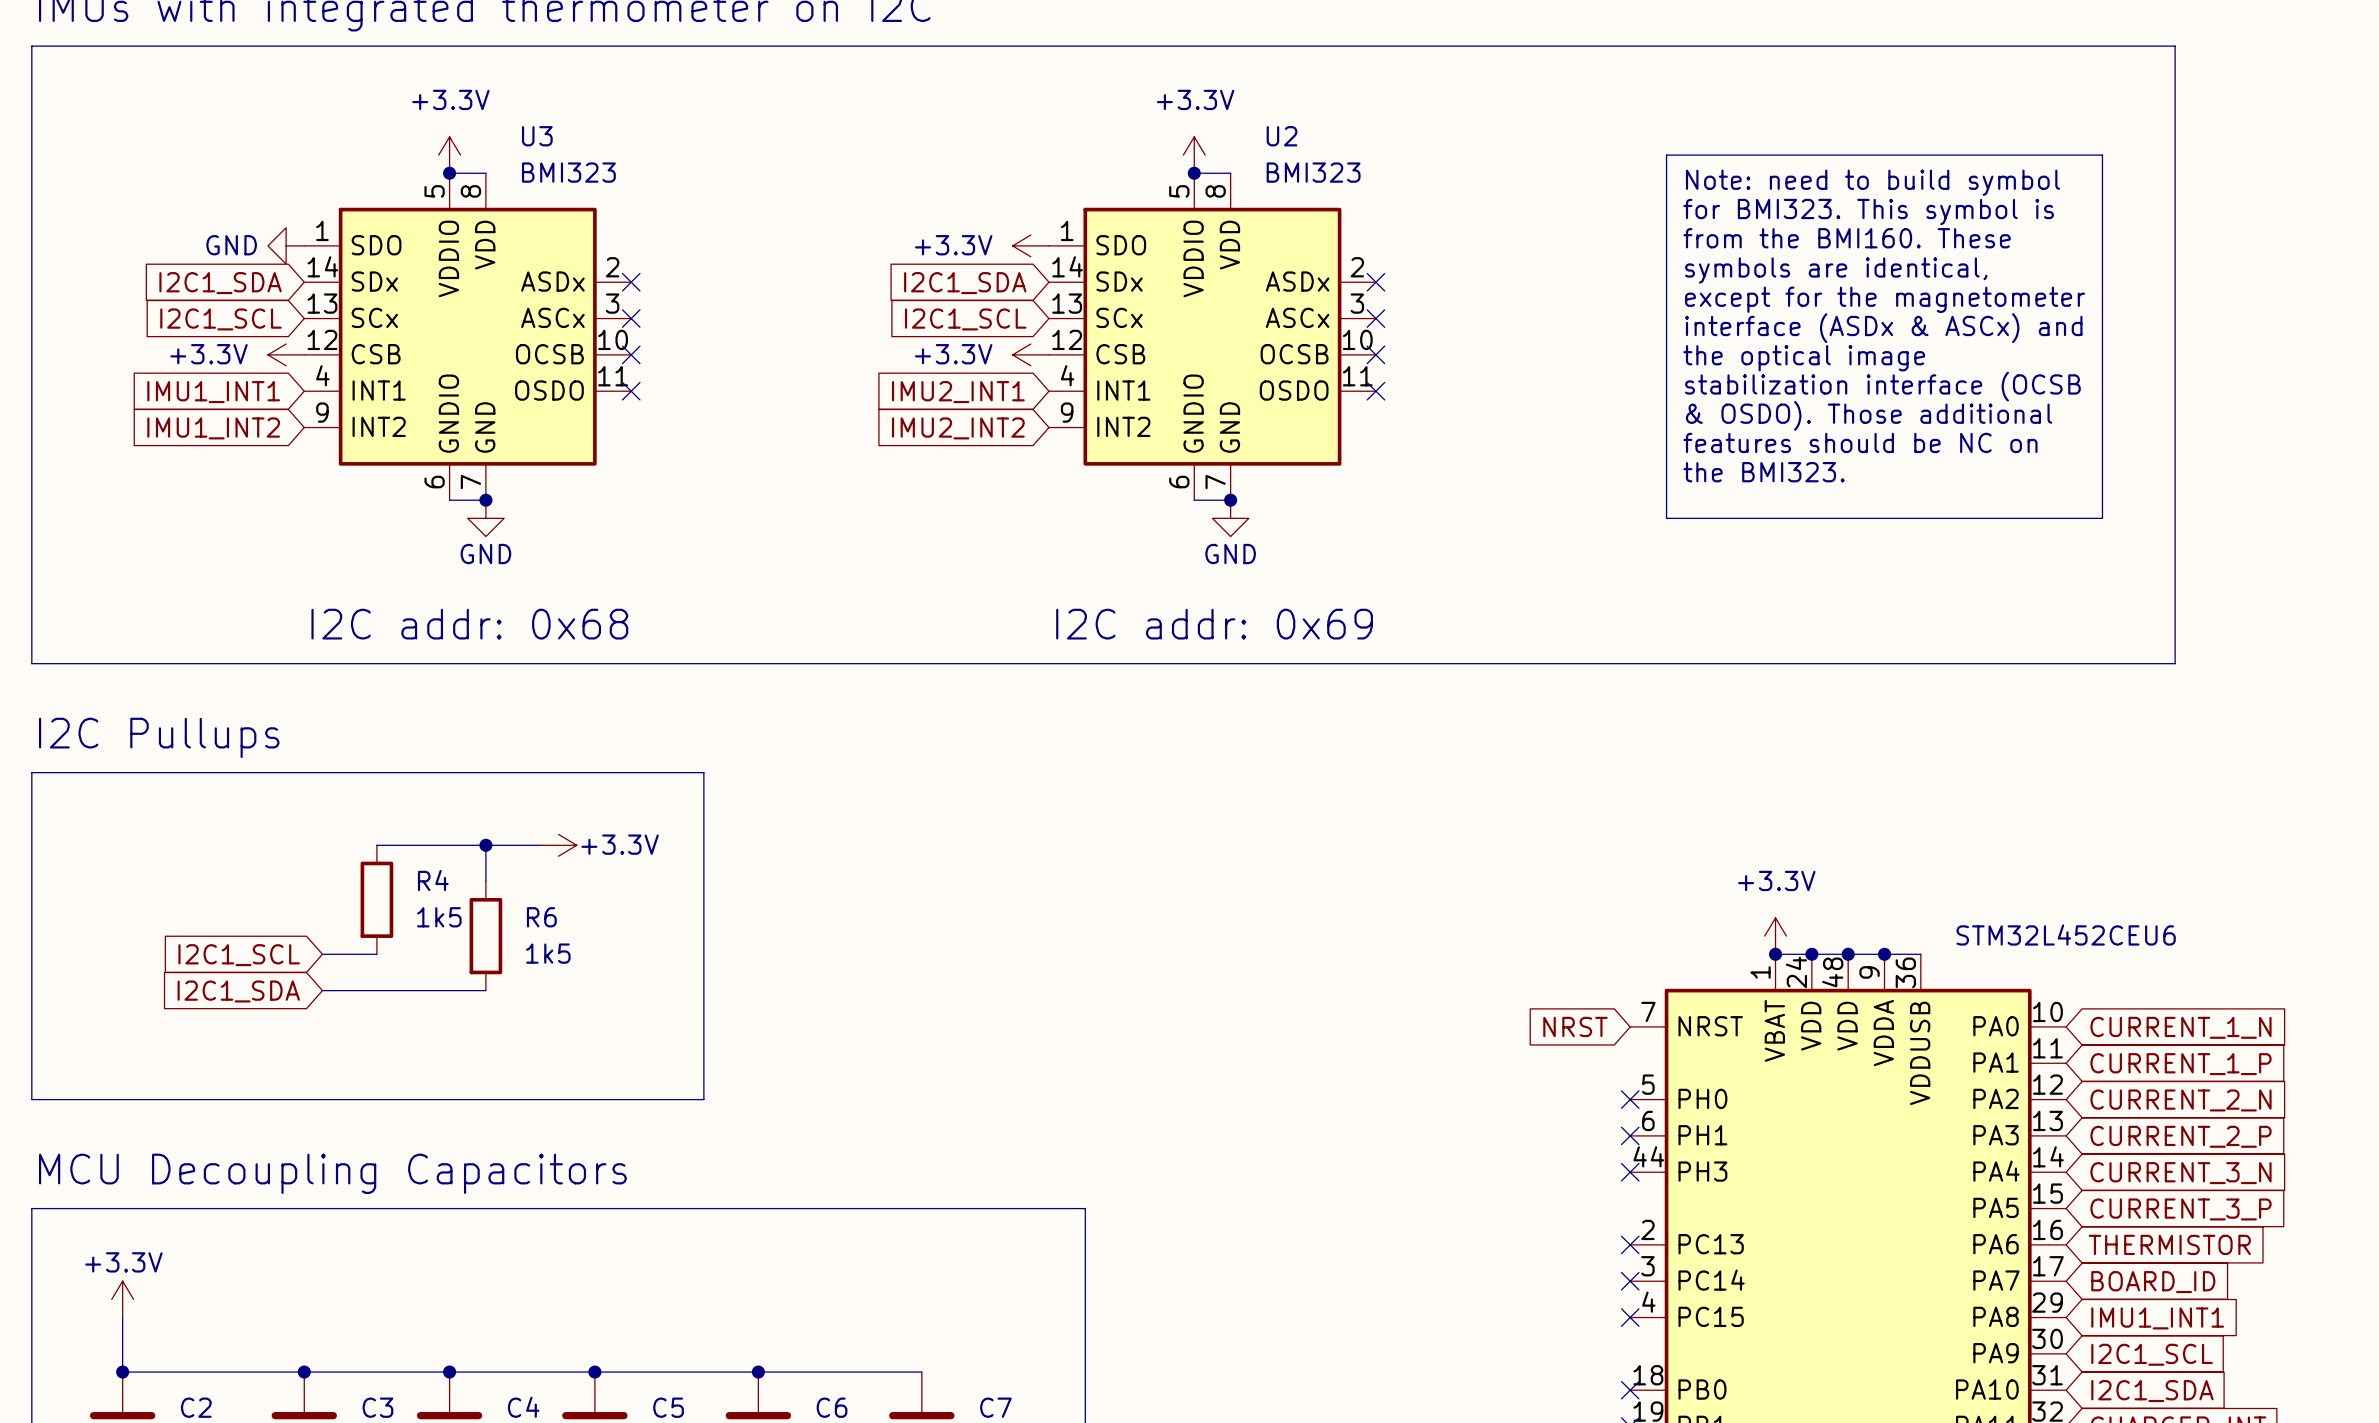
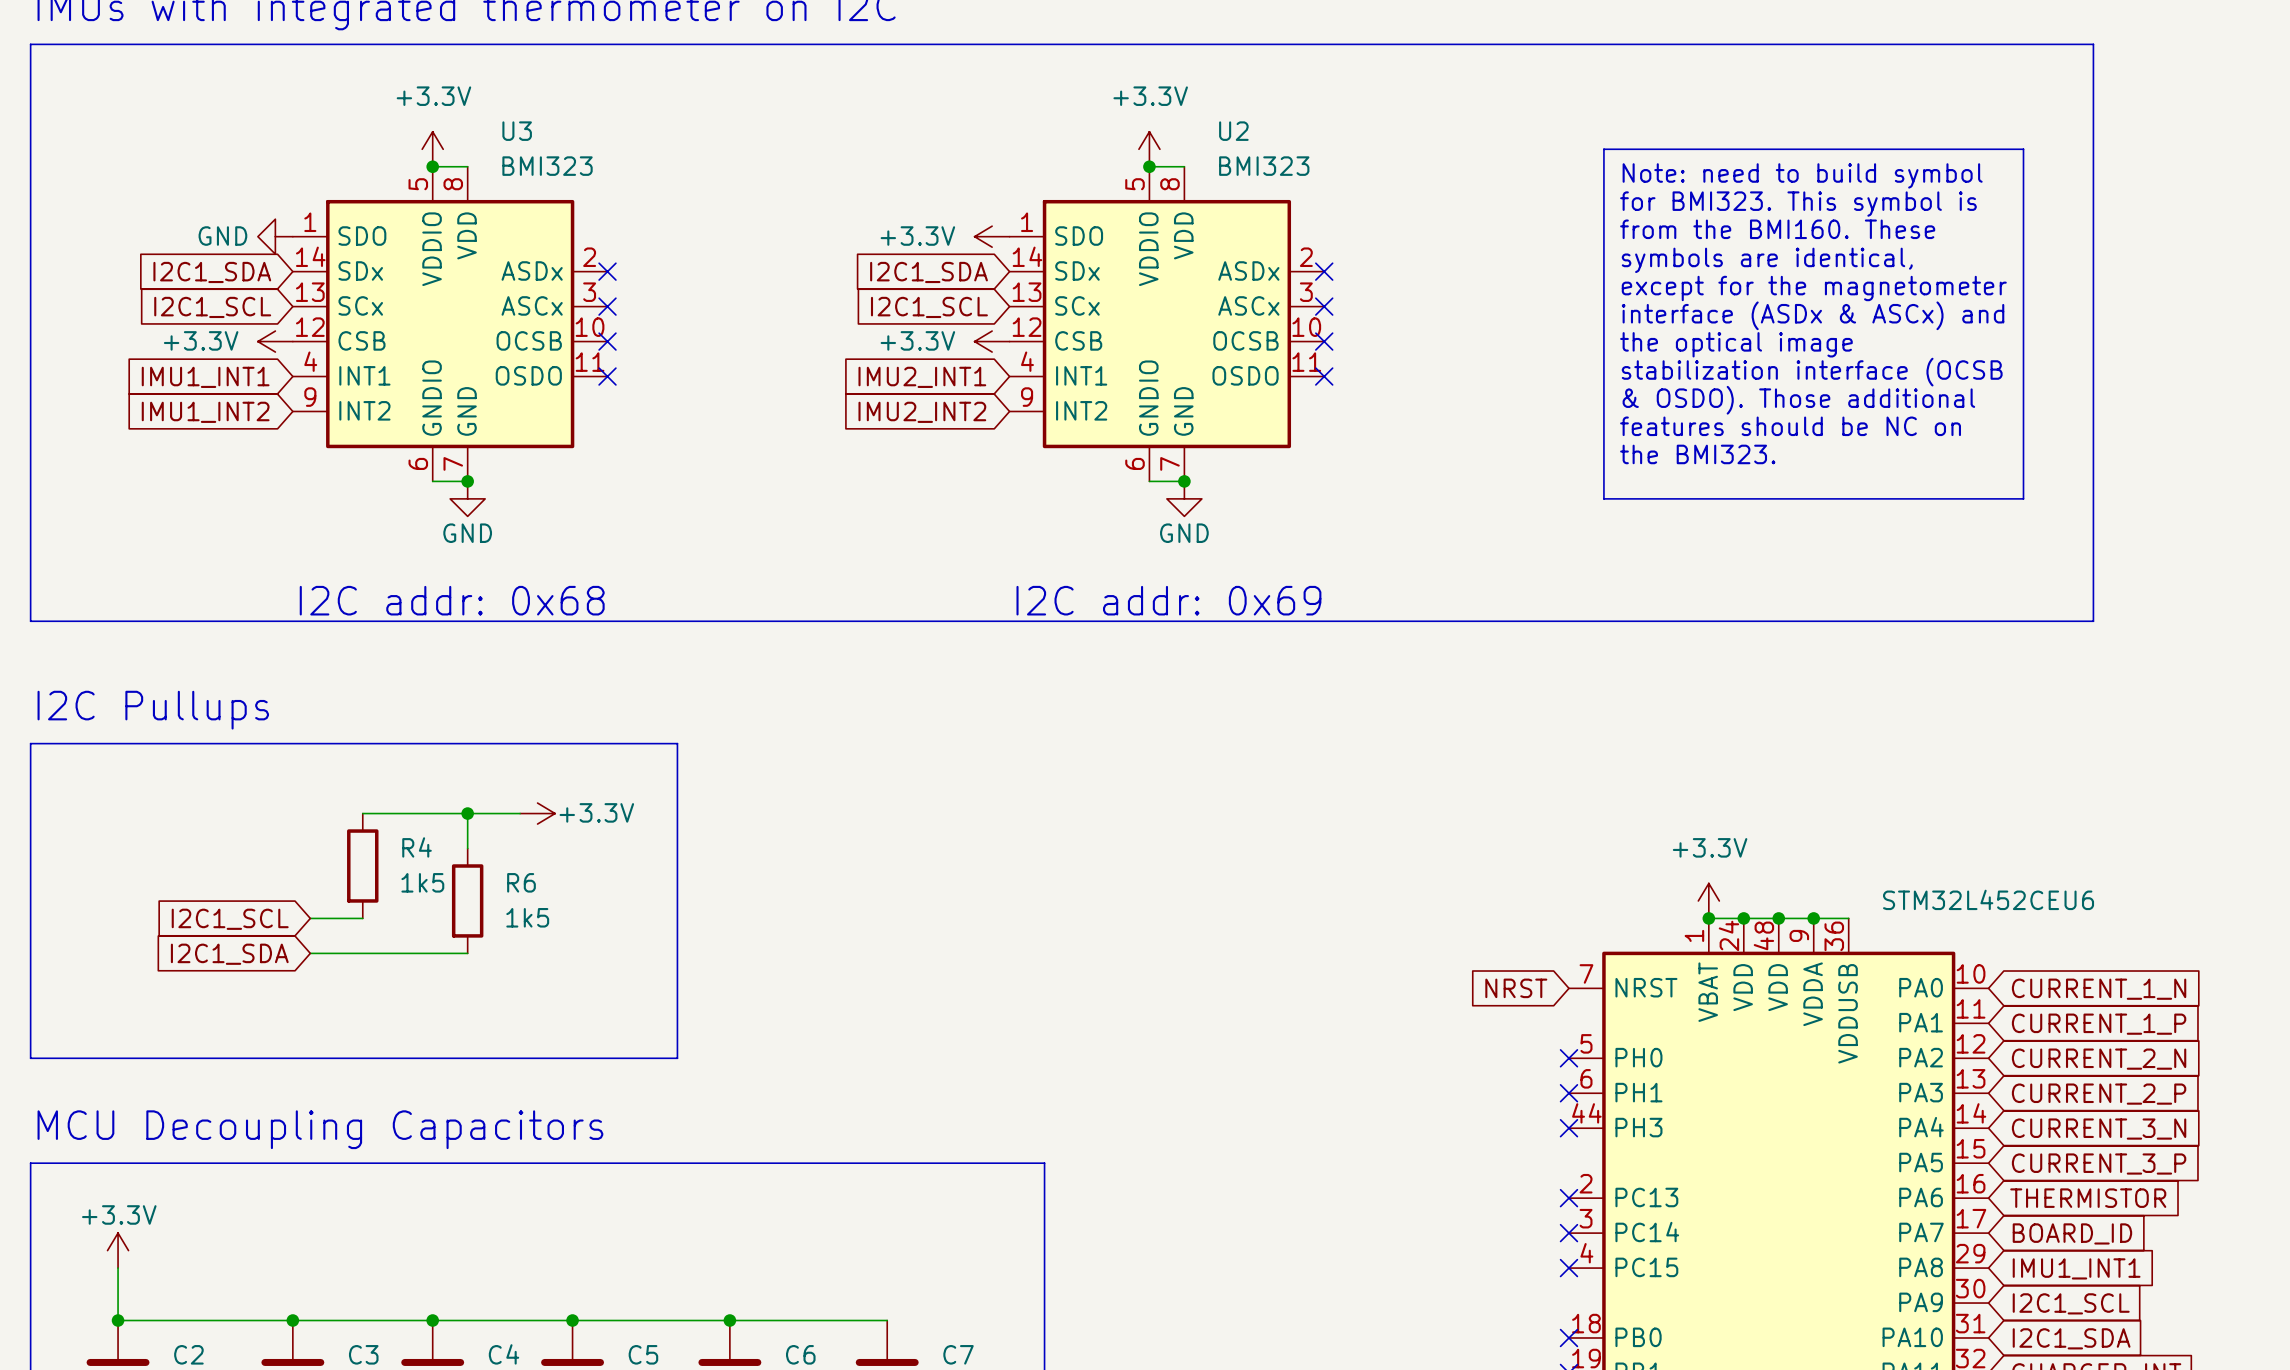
line: (31, 645) (31, 663) (2175, 663) (2175, 645) -> (30, 621) (2093, 621)

